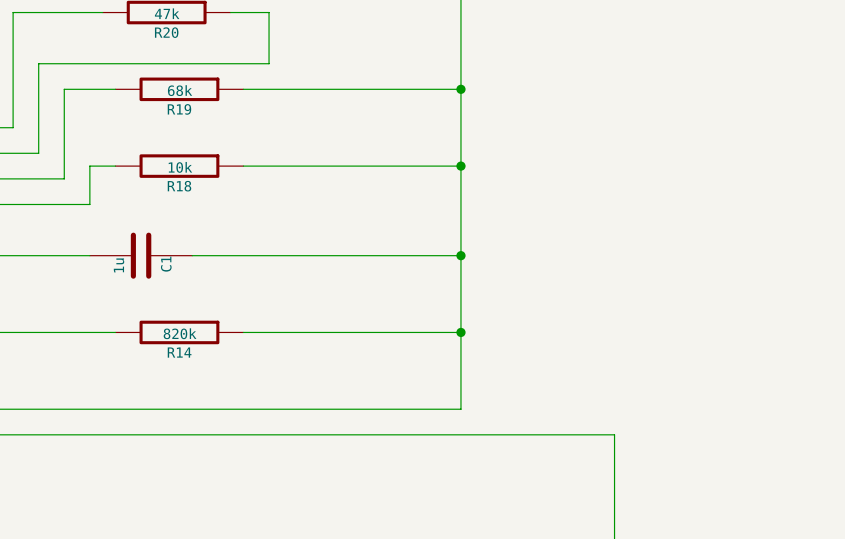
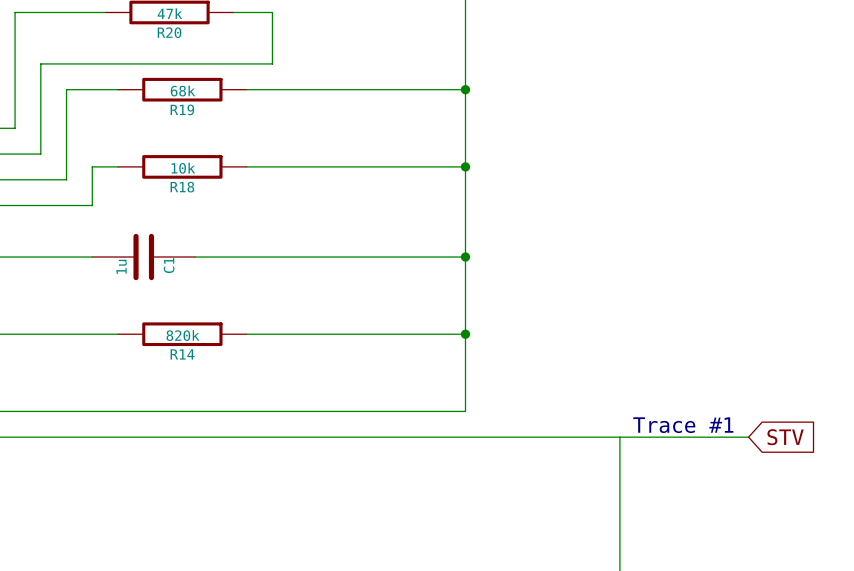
text: none -> Trace #1 (683, 425)
wire: none -> (619, 437) (748, 437)
global label: none -> STV (785, 437)

